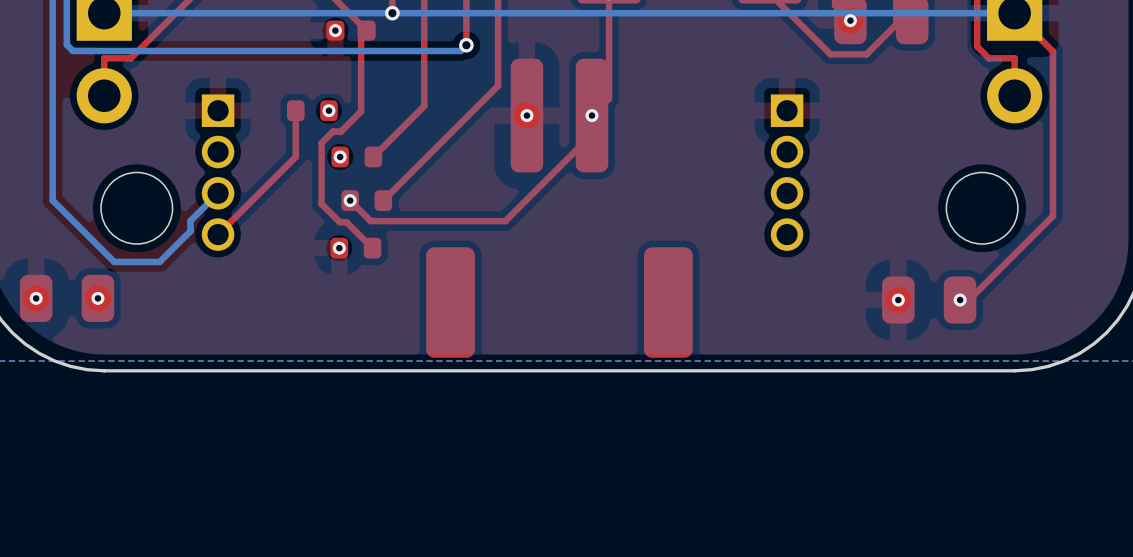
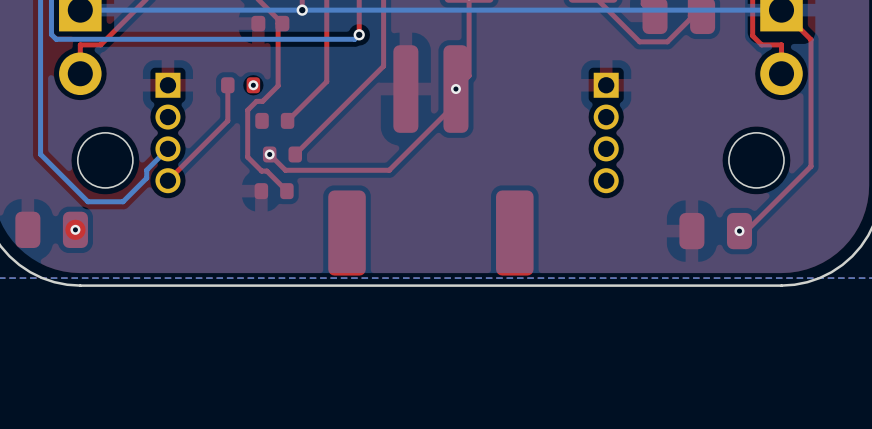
via: (850, 20) -> none
via: (335, 30) -> none
via: (526, 115) -> none
via: (340, 156) -> none
via: (339, 248) -> none
via: (36, 298) -> none
via: (898, 300) -> none

